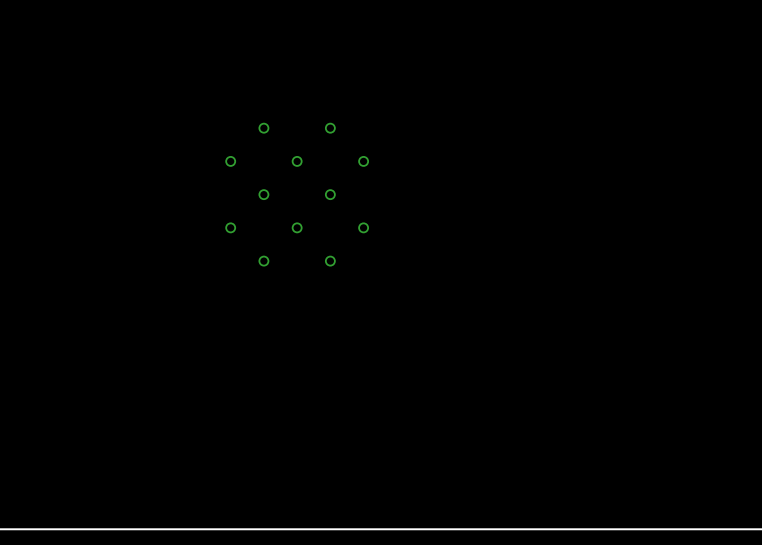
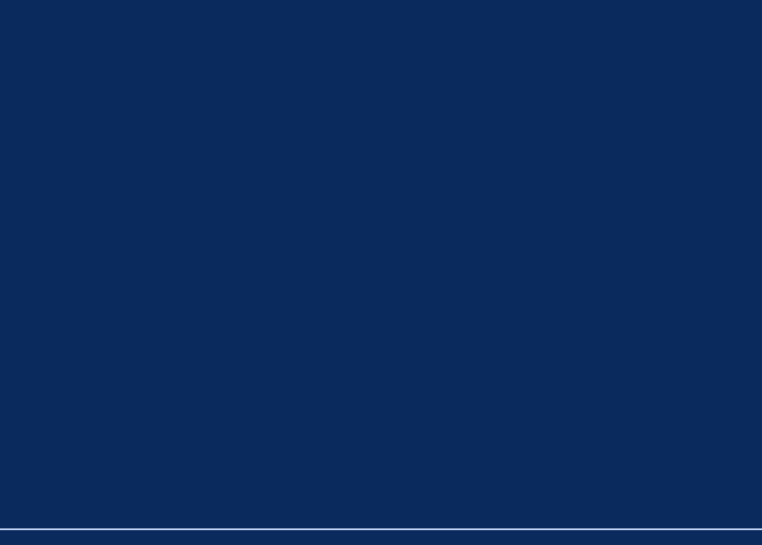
part: (297, 194) -> none

